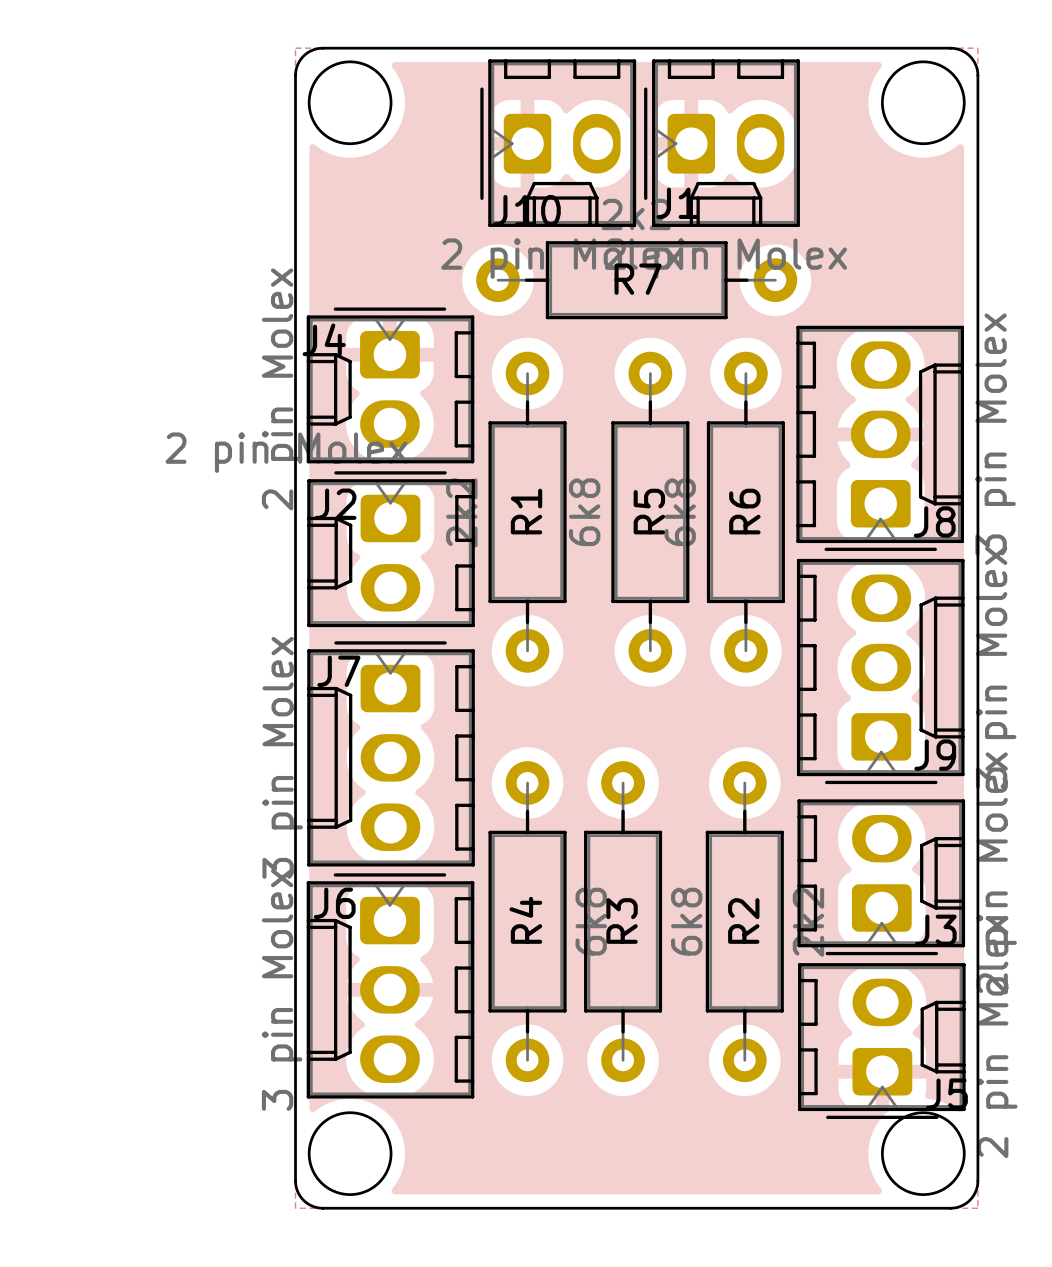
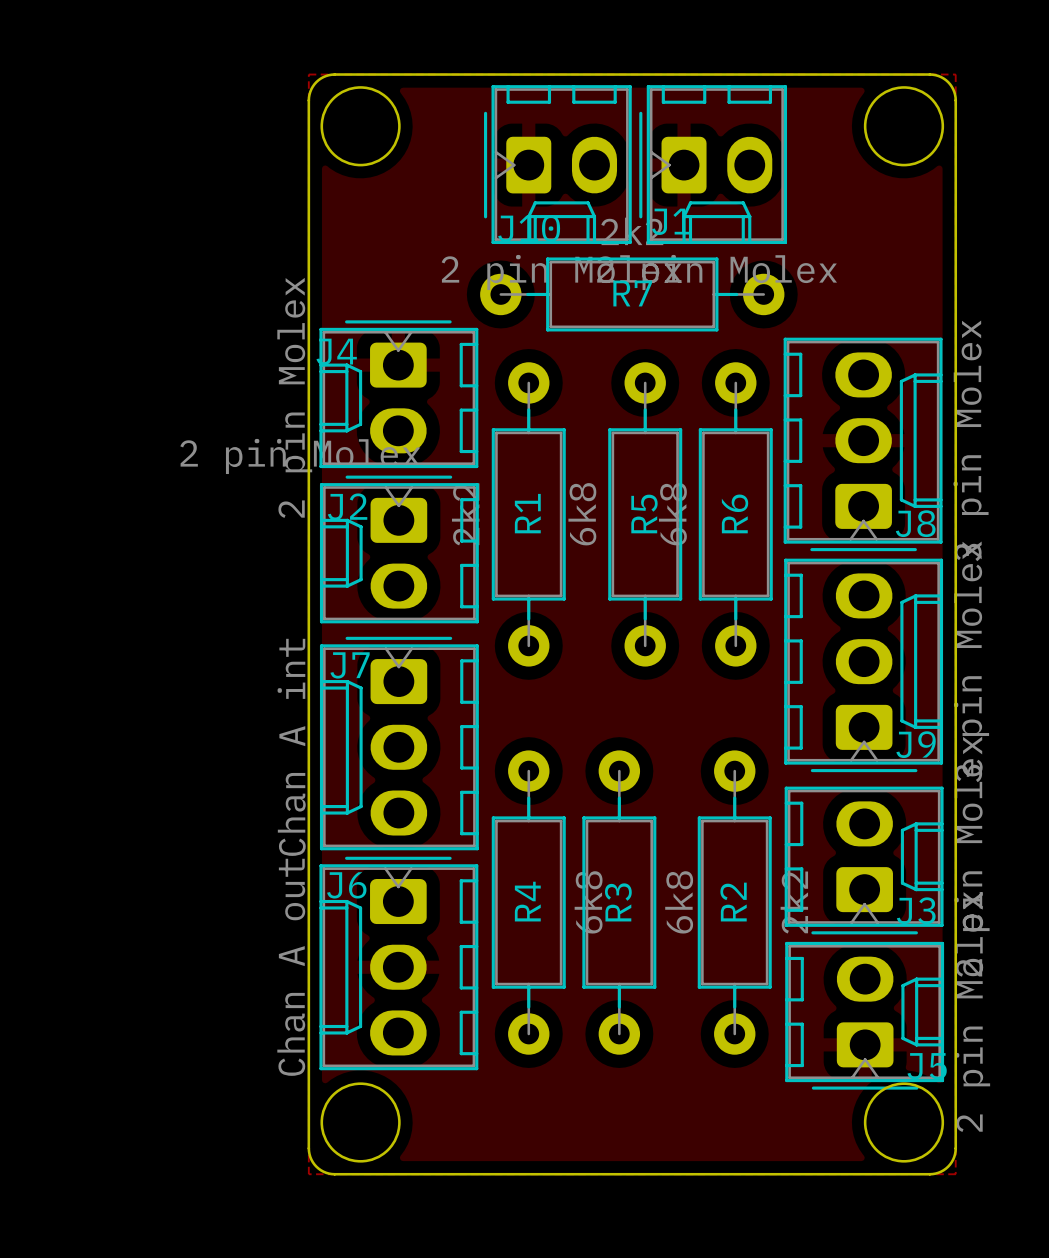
J7 value: 3 pin Molex (282, 757) -> Chan A int (291, 747)
J6 value: 3 pin Molex (282, 989) -> Chan A out (291, 967)

